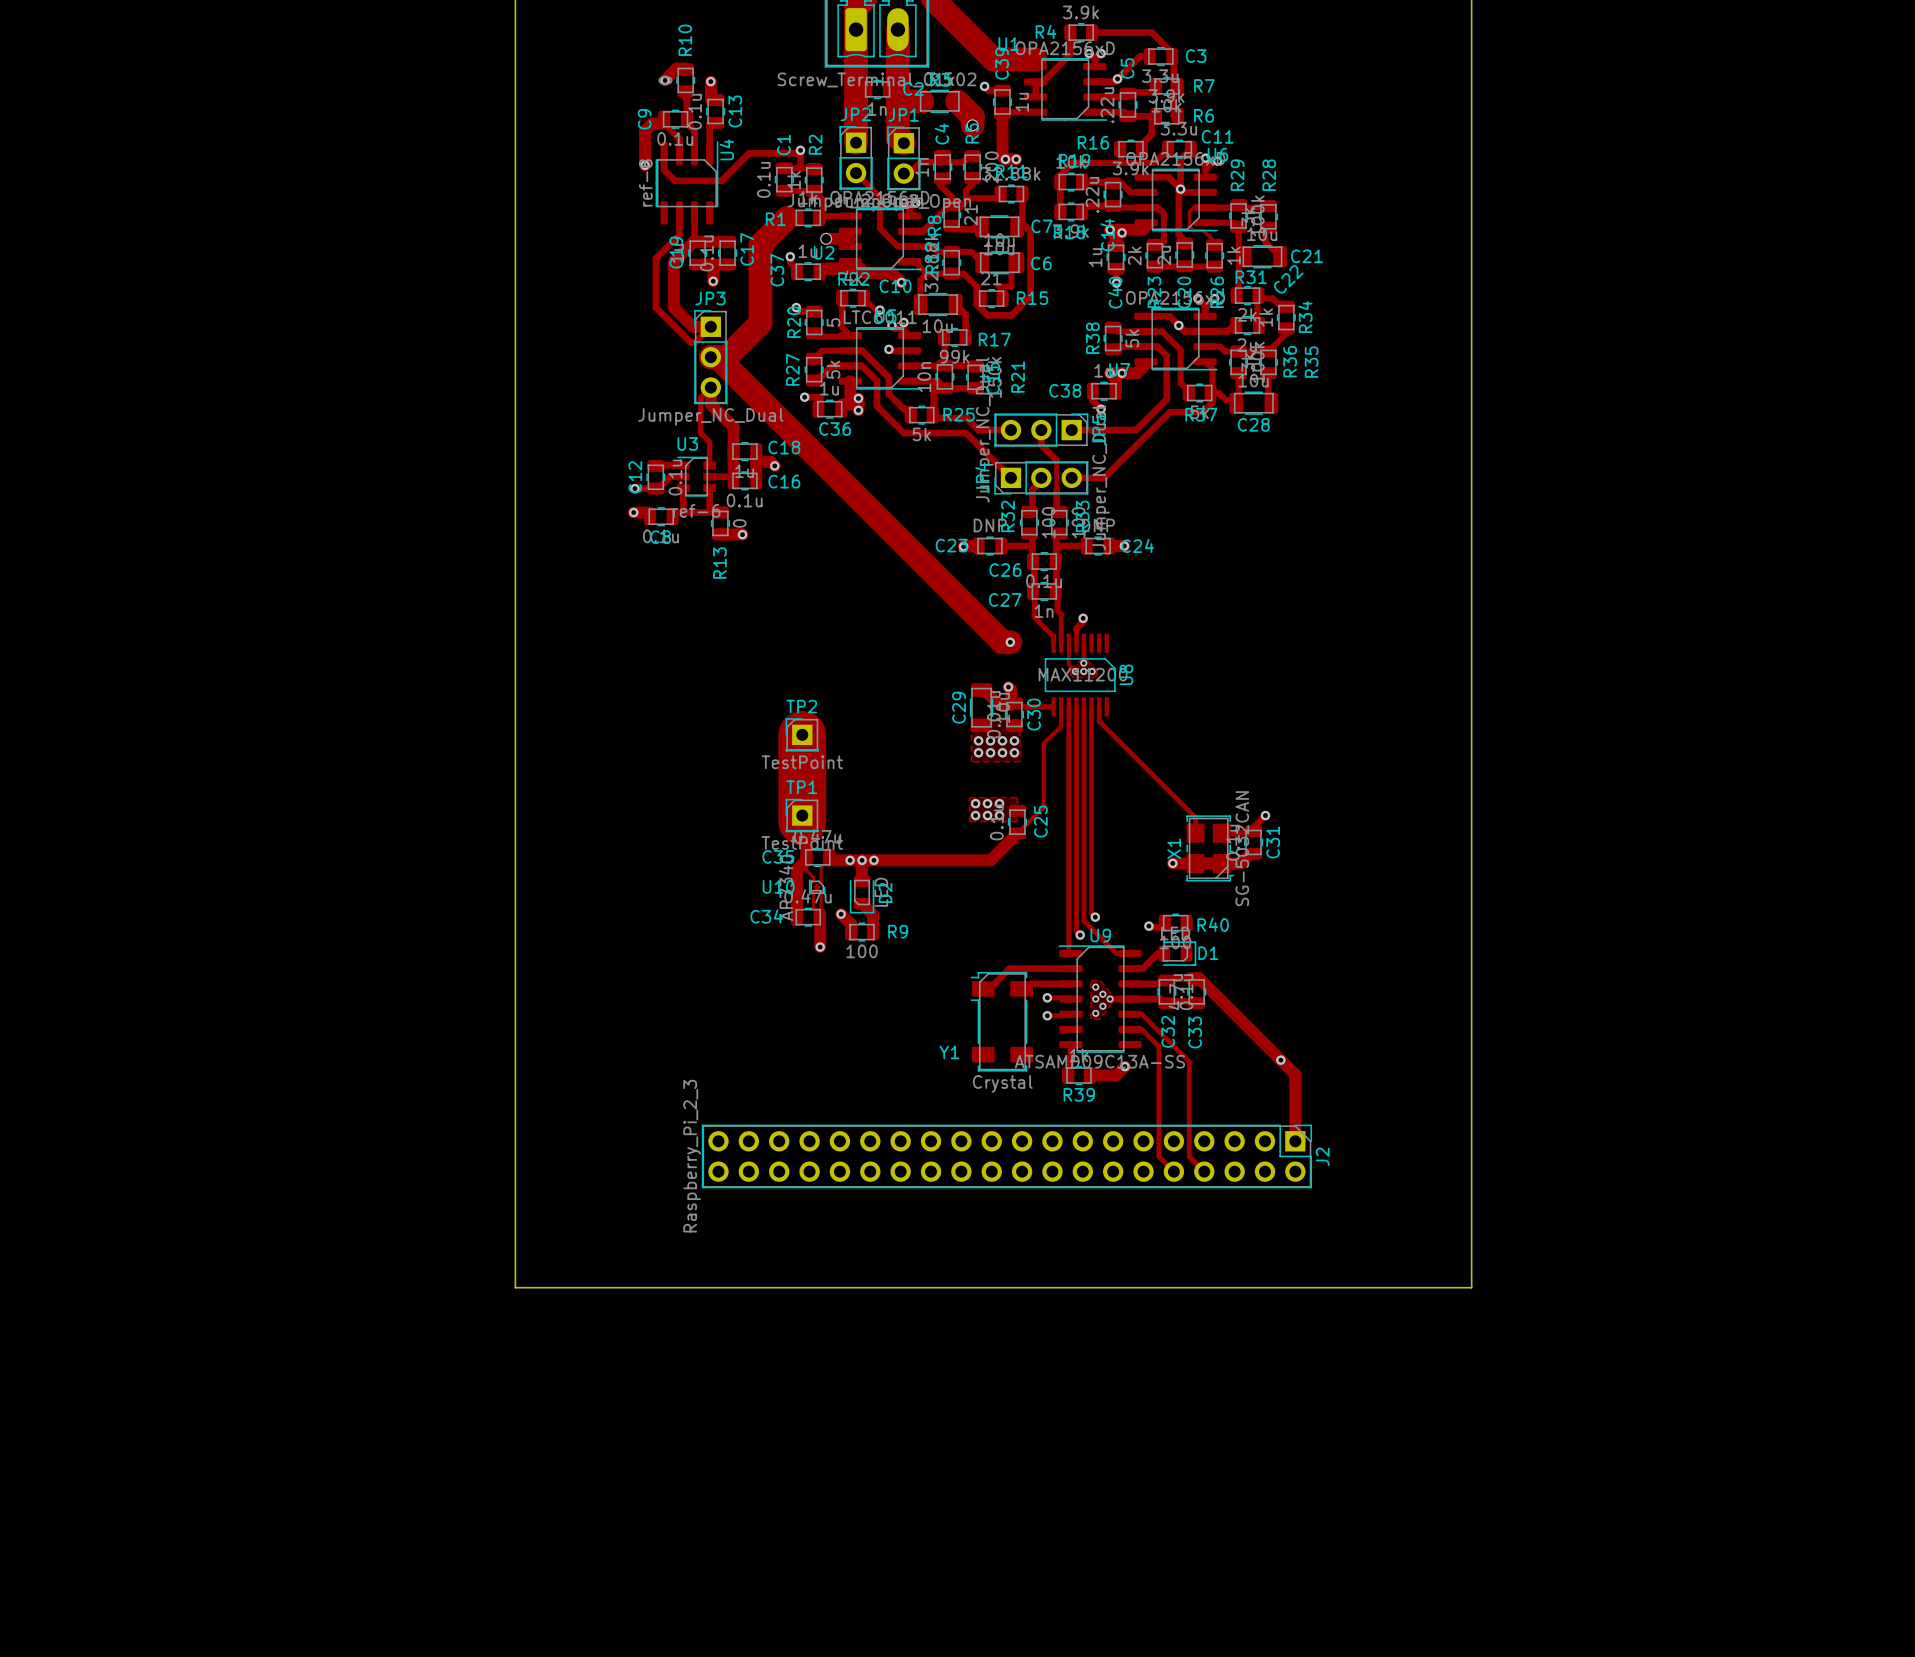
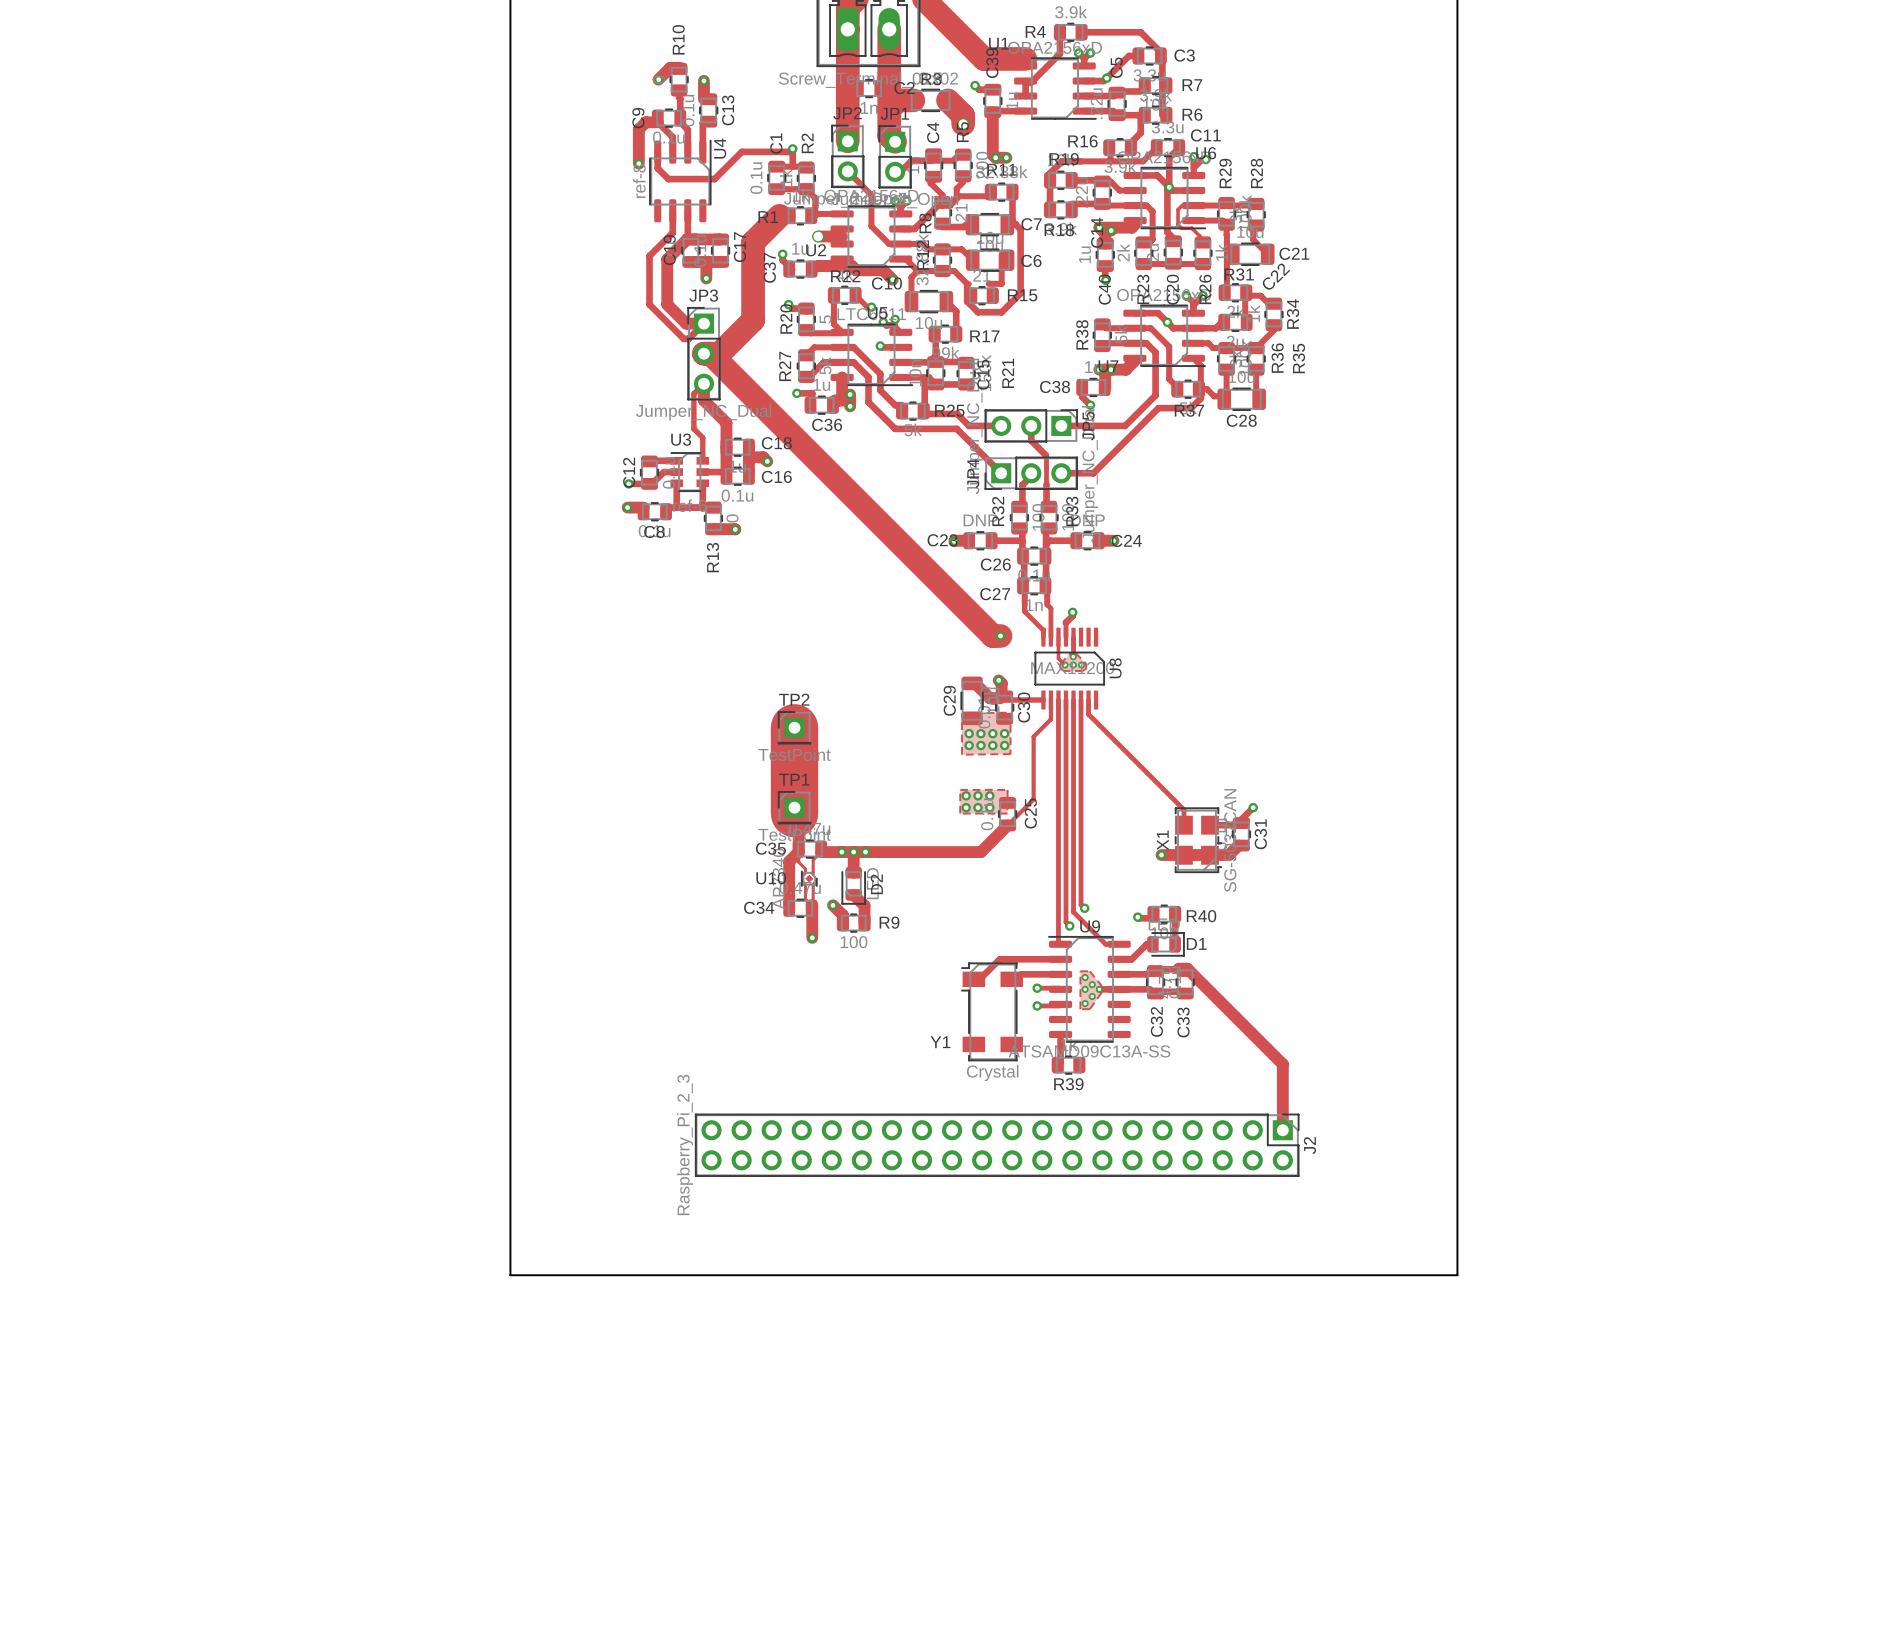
top track: (1130, 1014) (1141, 1014) (1189, 1061) (1189, 1156) (1204, 1171) -> none
top track: (1130, 1029) (1141, 1029) (1158, 1046) (1158, 1156) (1173, 1171) -> none
via: (1280, 1060) -> none
top track: (1125, 1066) (1116, 1075) (1089, 1075) -> none
via: (1125, 1066) -> none

